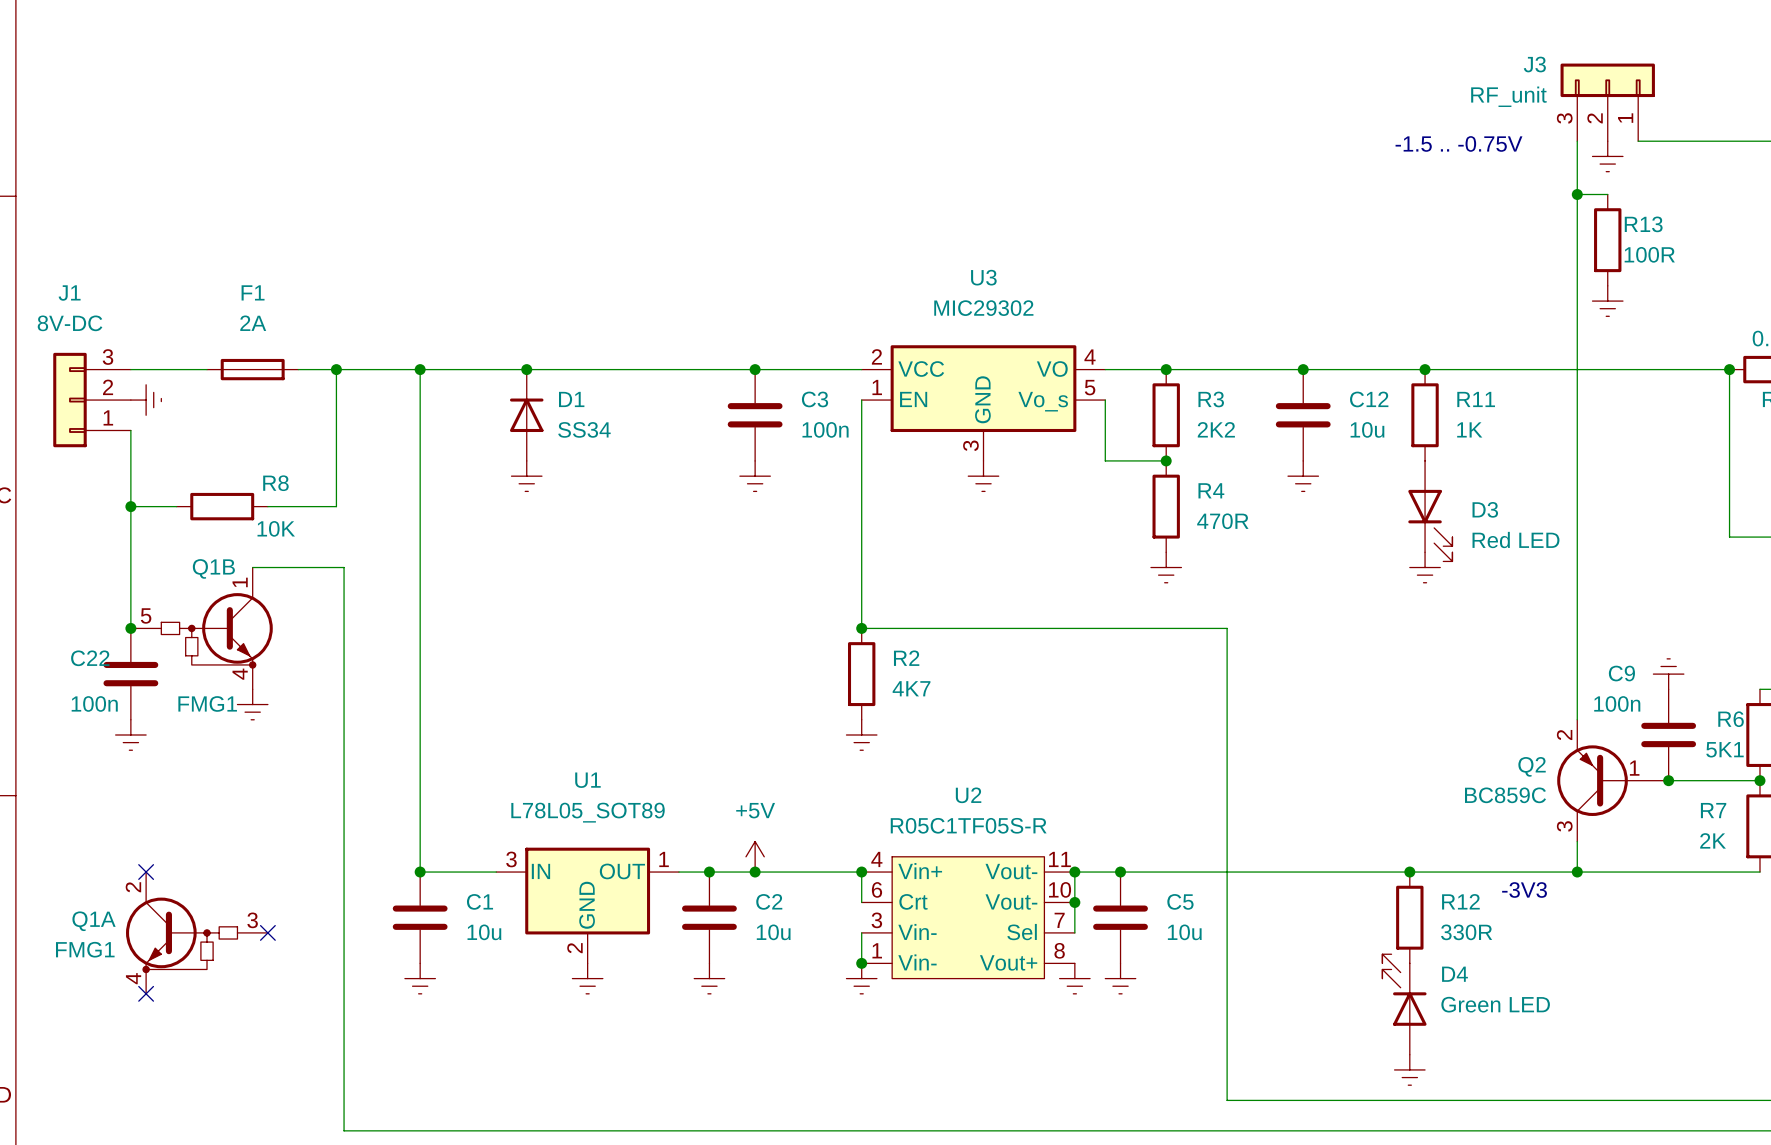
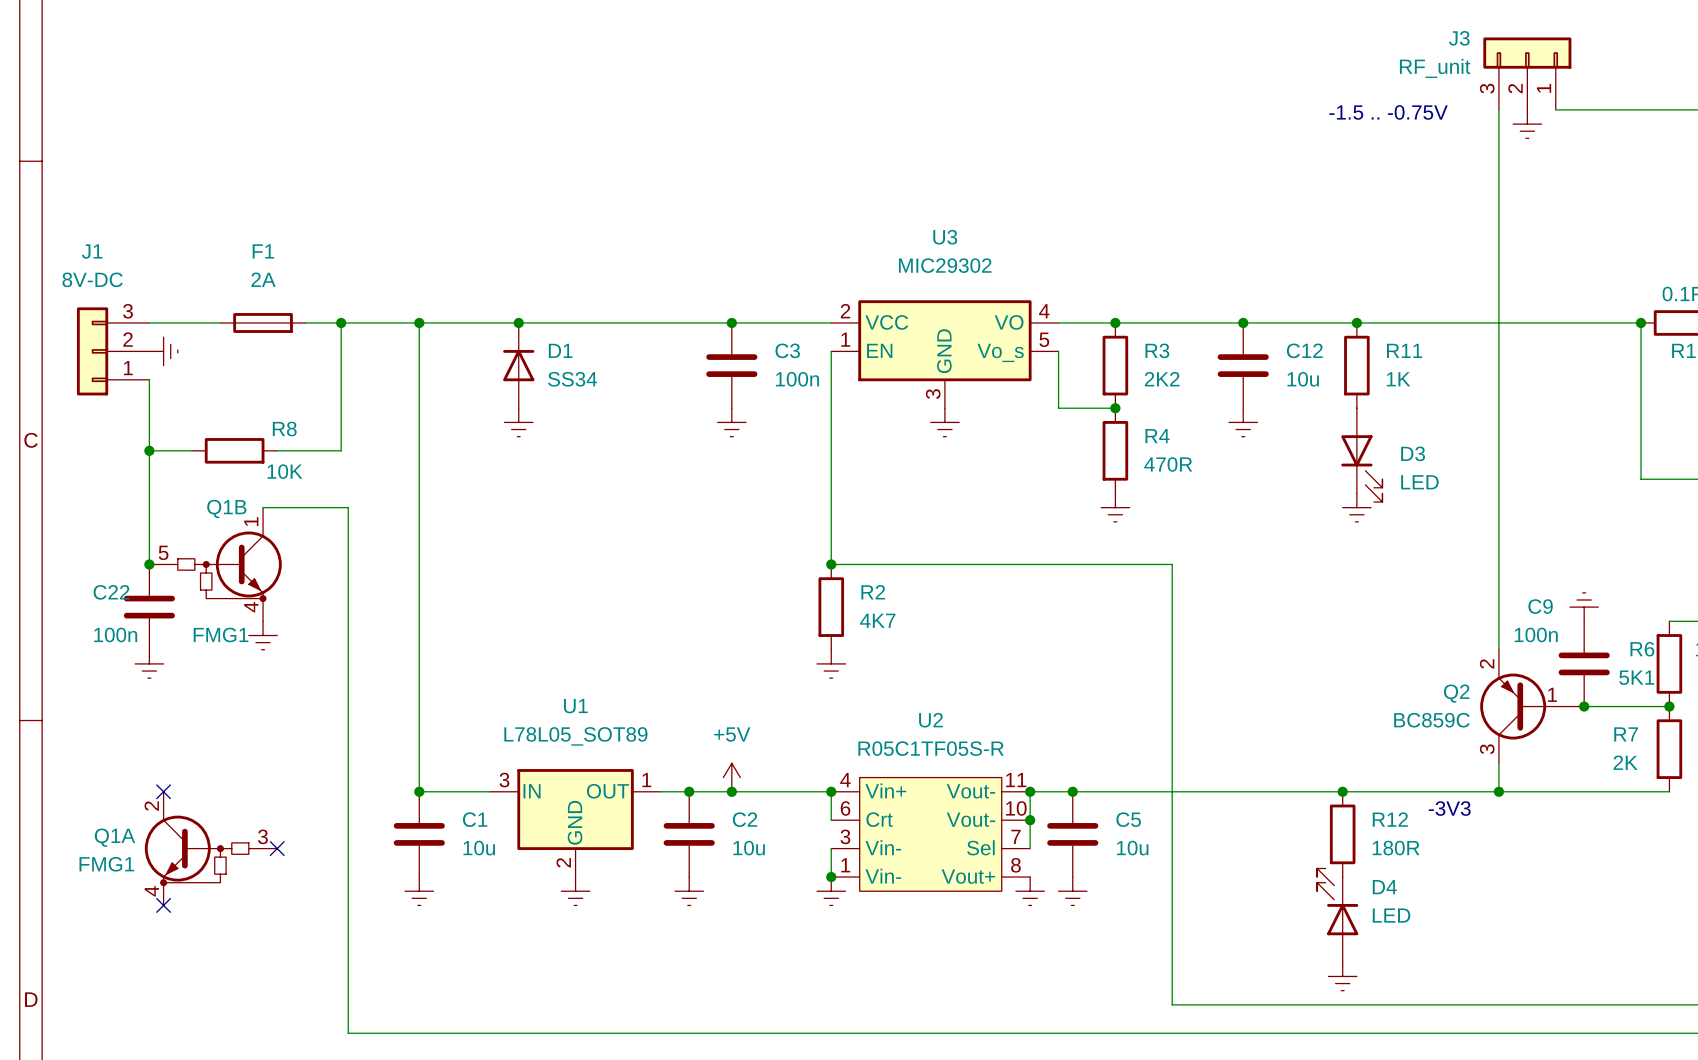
wire: (1577, 194) (1607, 194) -> none
junction: (1577, 194) -> none
R13: 100R (1607, 240) -> none
power symbol: (1607, 301) -> none
D3 value: Red LED (1515, 540) -> LED (1419, 482)
R12 value: 330R (1466, 932) -> 180R (1396, 848)
D4 value: Green LED (1495, 1004) -> LED (1391, 915)

